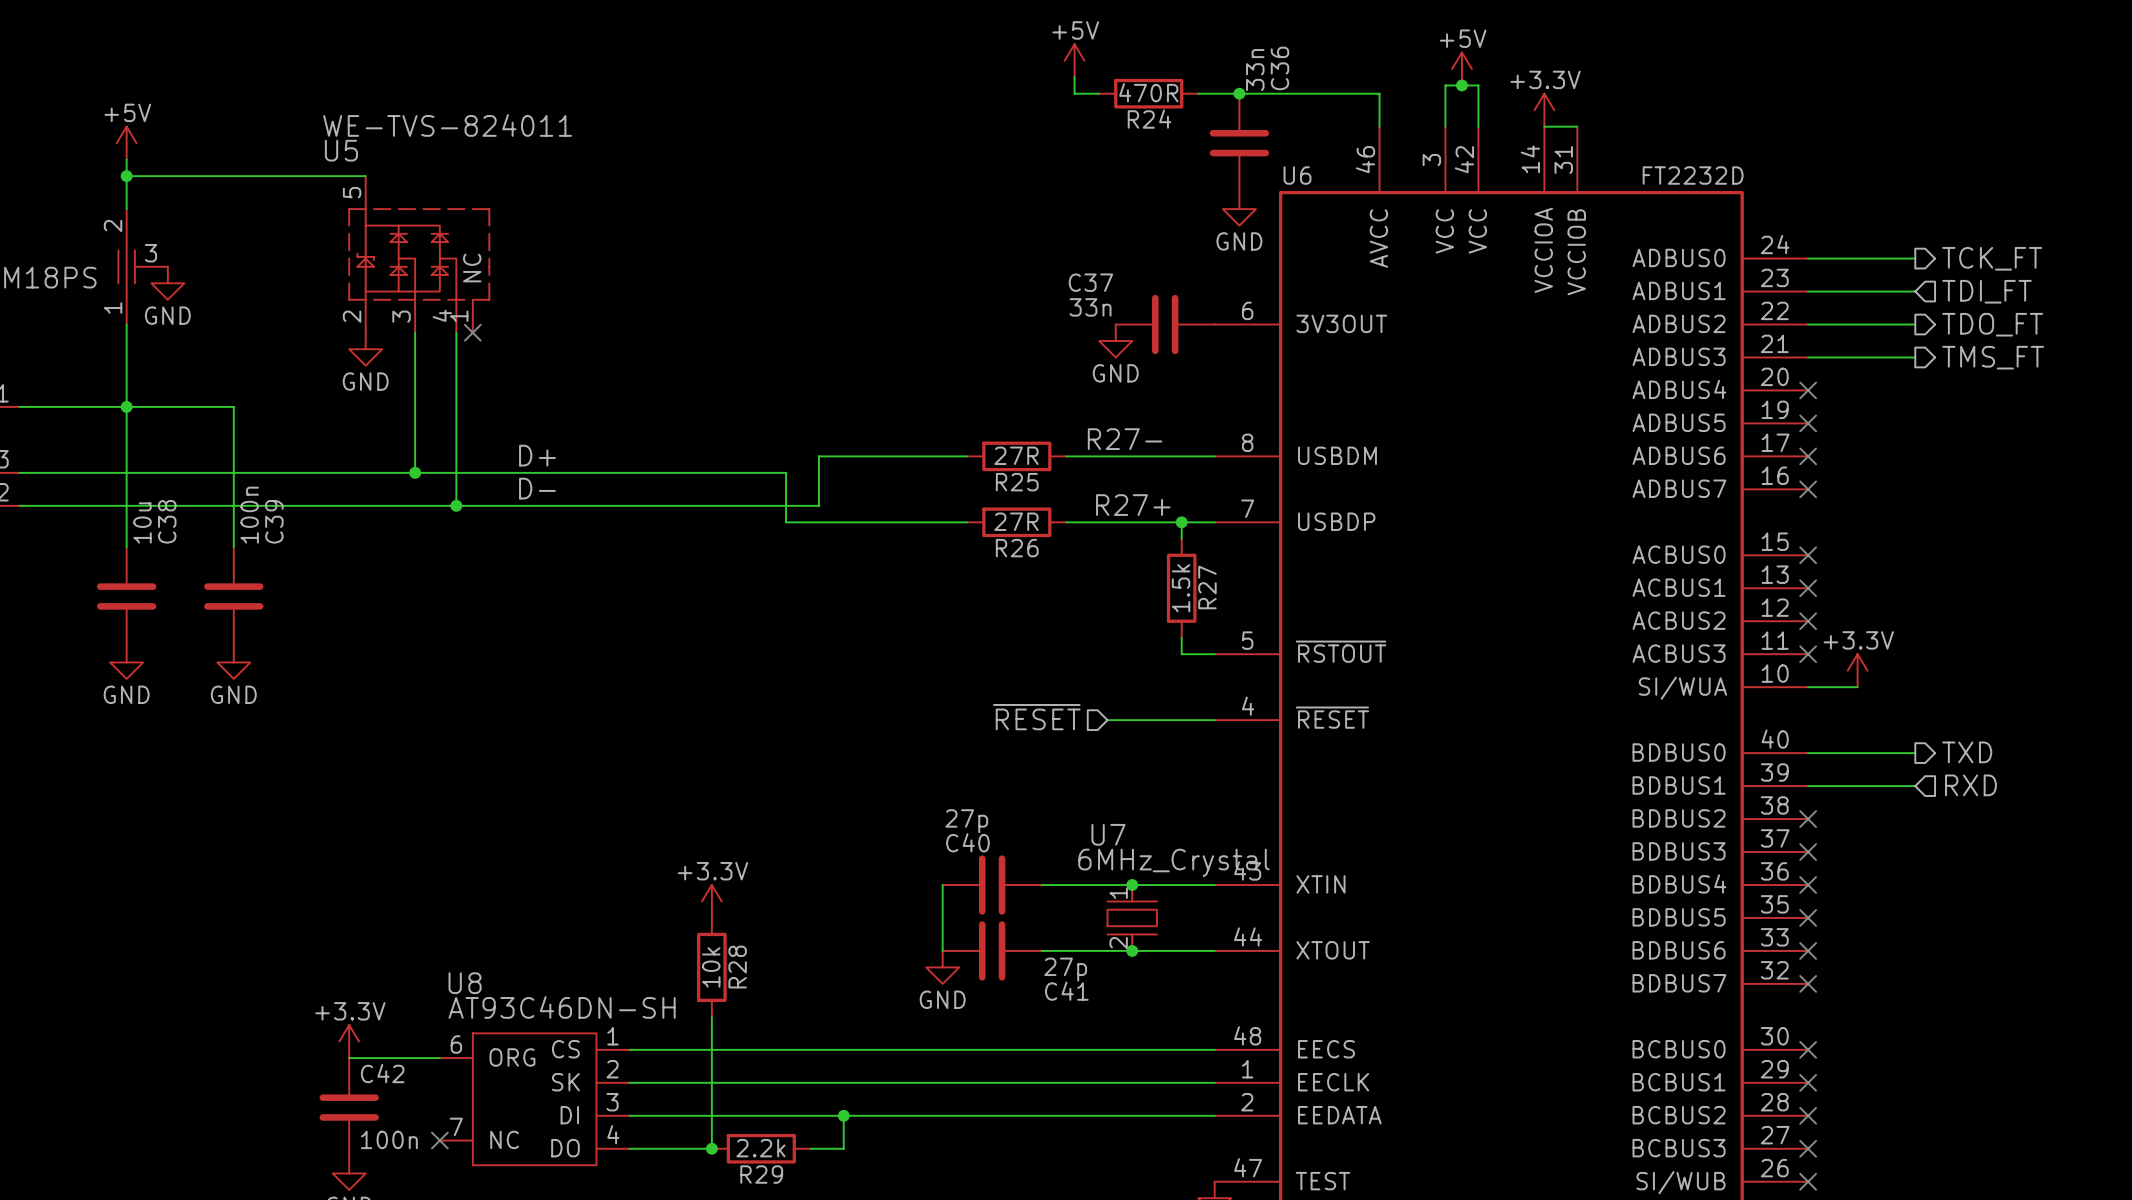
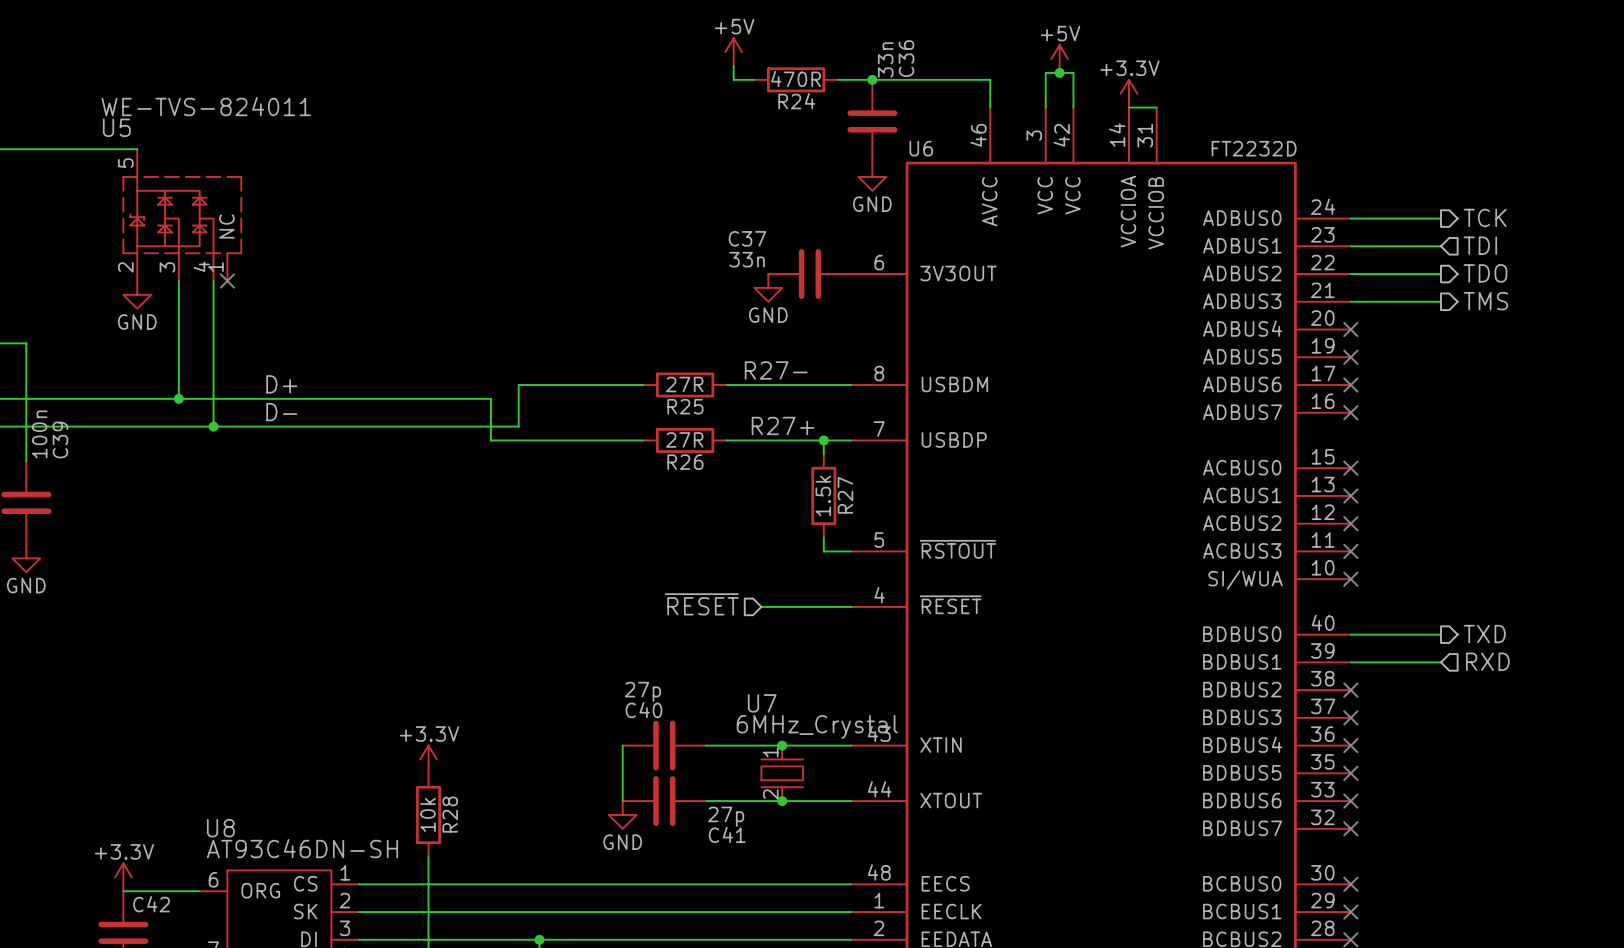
hierarchical label: TCK_FT (1992, 258) -> TCK (1485, 217)
hierarchical label: TDI_FT (1987, 291) -> TDI (1480, 245)
hierarchical label: TDO_FT (1992, 324) -> TDO (1485, 273)
hierarchical label: TMS_FT (1993, 357) -> TMS (1485, 301)
power symbol: +3.3V (1857, 670) -> none
wire: (1808, 687) (1857, 687) -> none
no-connect mark: none -> (1350, 579)

